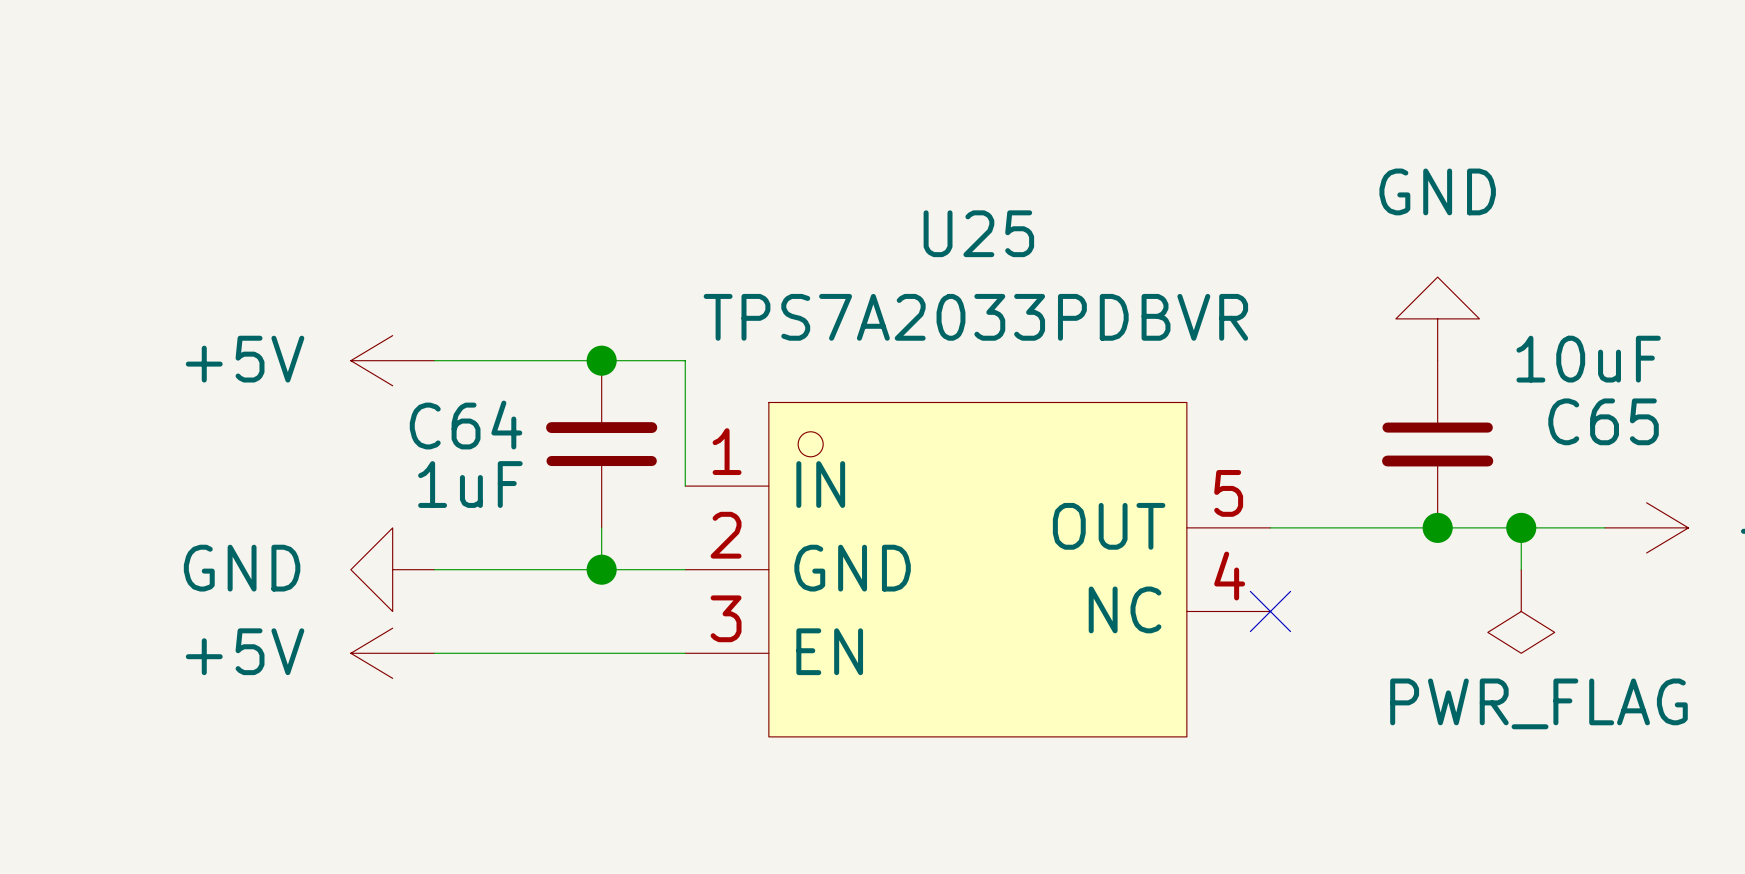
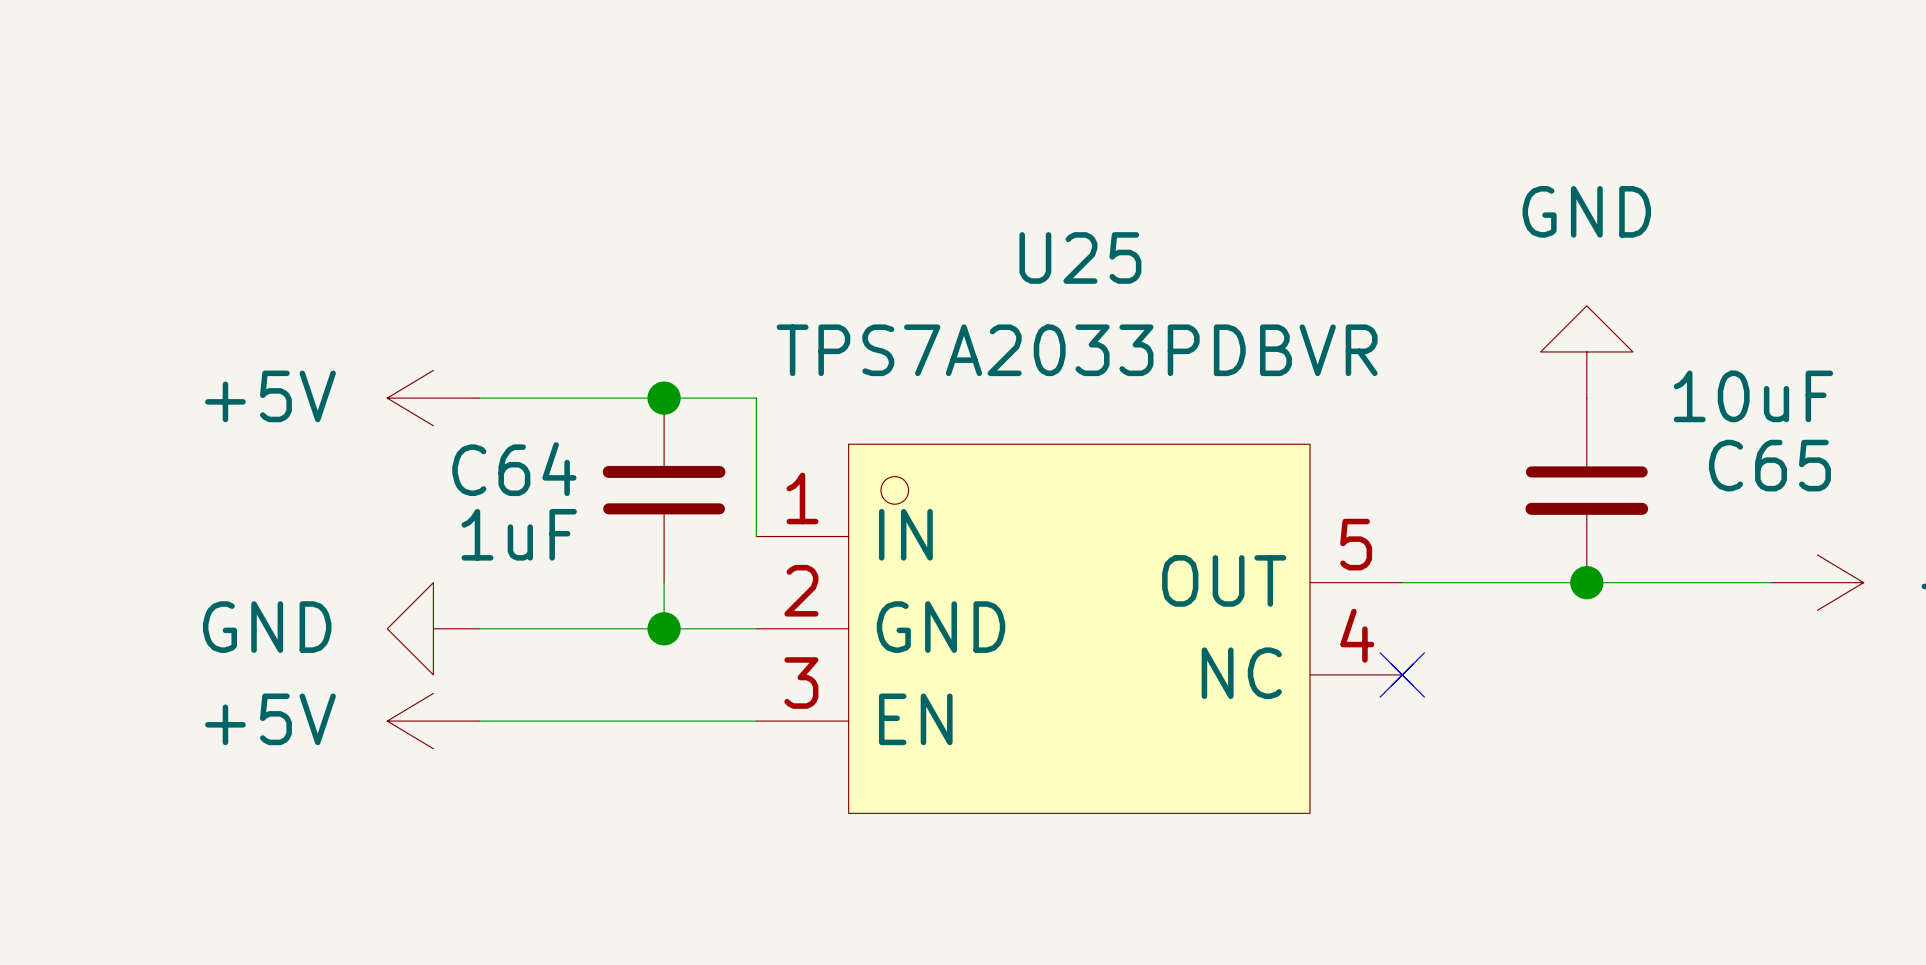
U25 symbol: [685, 402, 1271, 737] -> [756, 444, 1414, 814]
wire: (1521, 527) (1521, 569) -> none
junction: (1521, 527) -> none
power symbol: PWR_FLAG (1521, 611) -> none

